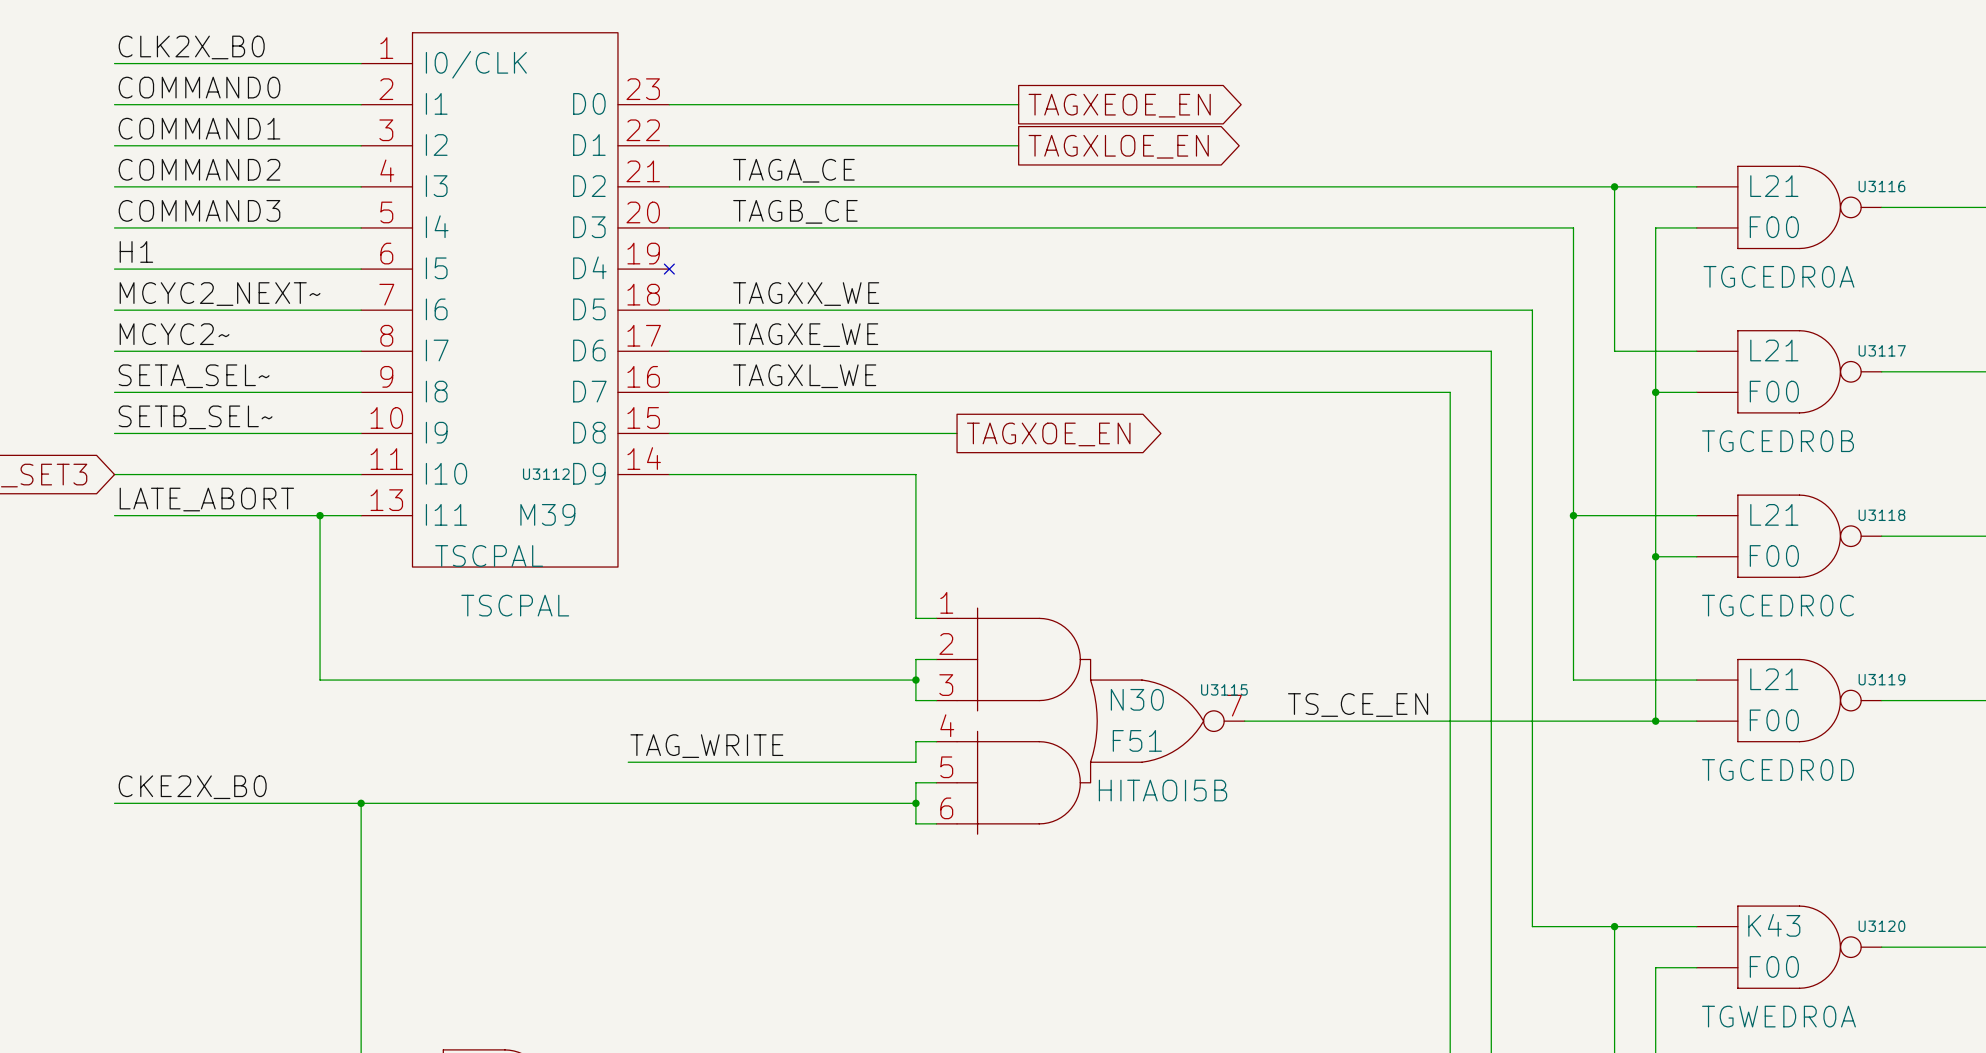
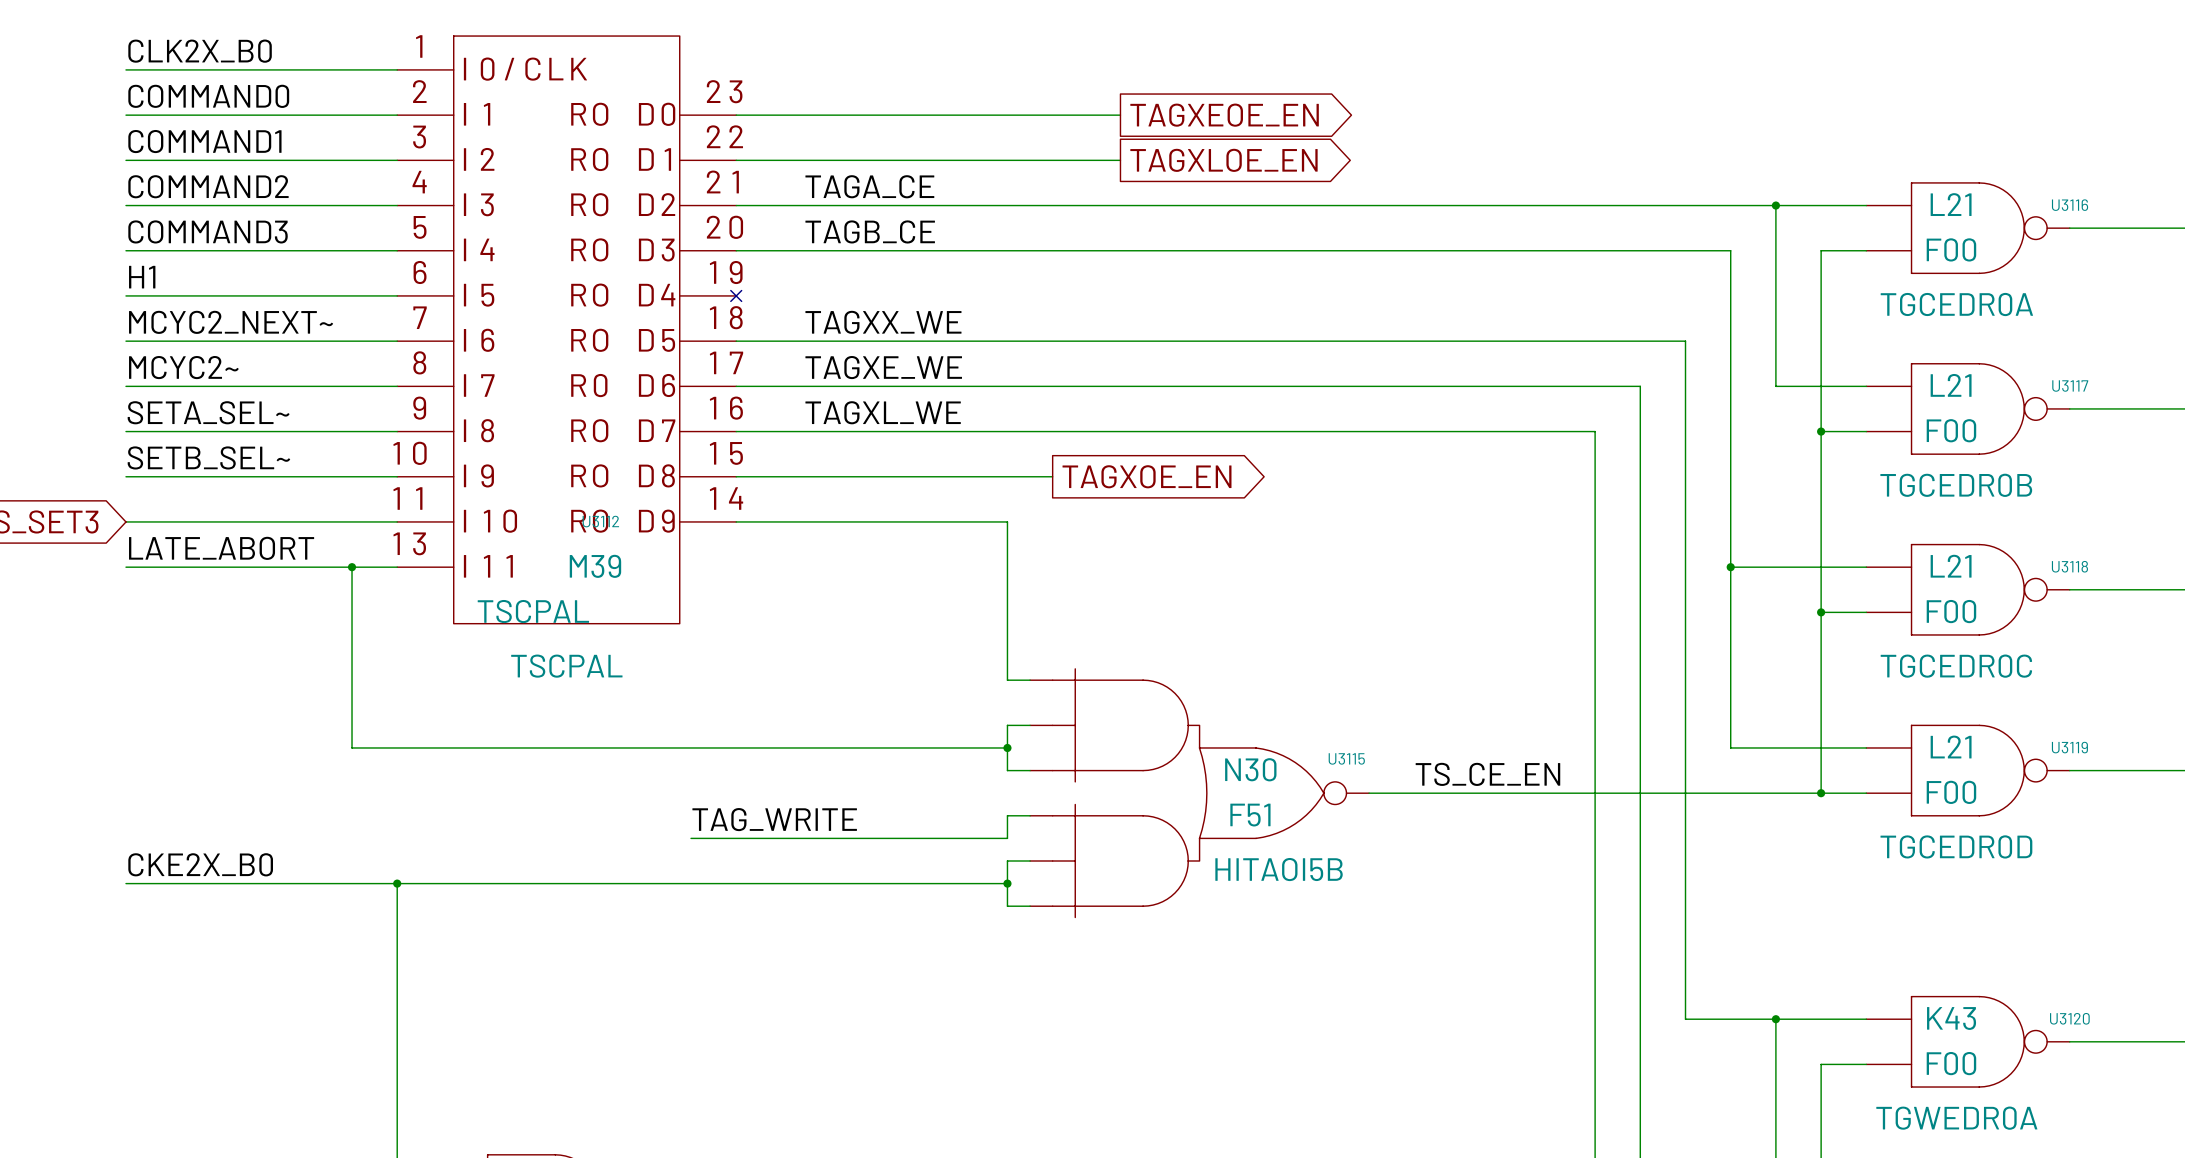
U3112 symbol: [361, 32, 670, 568] -> [397, 36, 737, 624]
U3115 pin number: 1 (946, 602) -> none
U3115 pin number: 2 (946, 643) -> none
U3115 pin number: 3 (946, 685) -> none
U3115 pin number: 7 (1234, 705) -> none
U3115 pin number: 4 (947, 725) -> none
U3115 pin number: 5 (946, 767) -> none
U3115 pin number: 6 (946, 808) -> none

